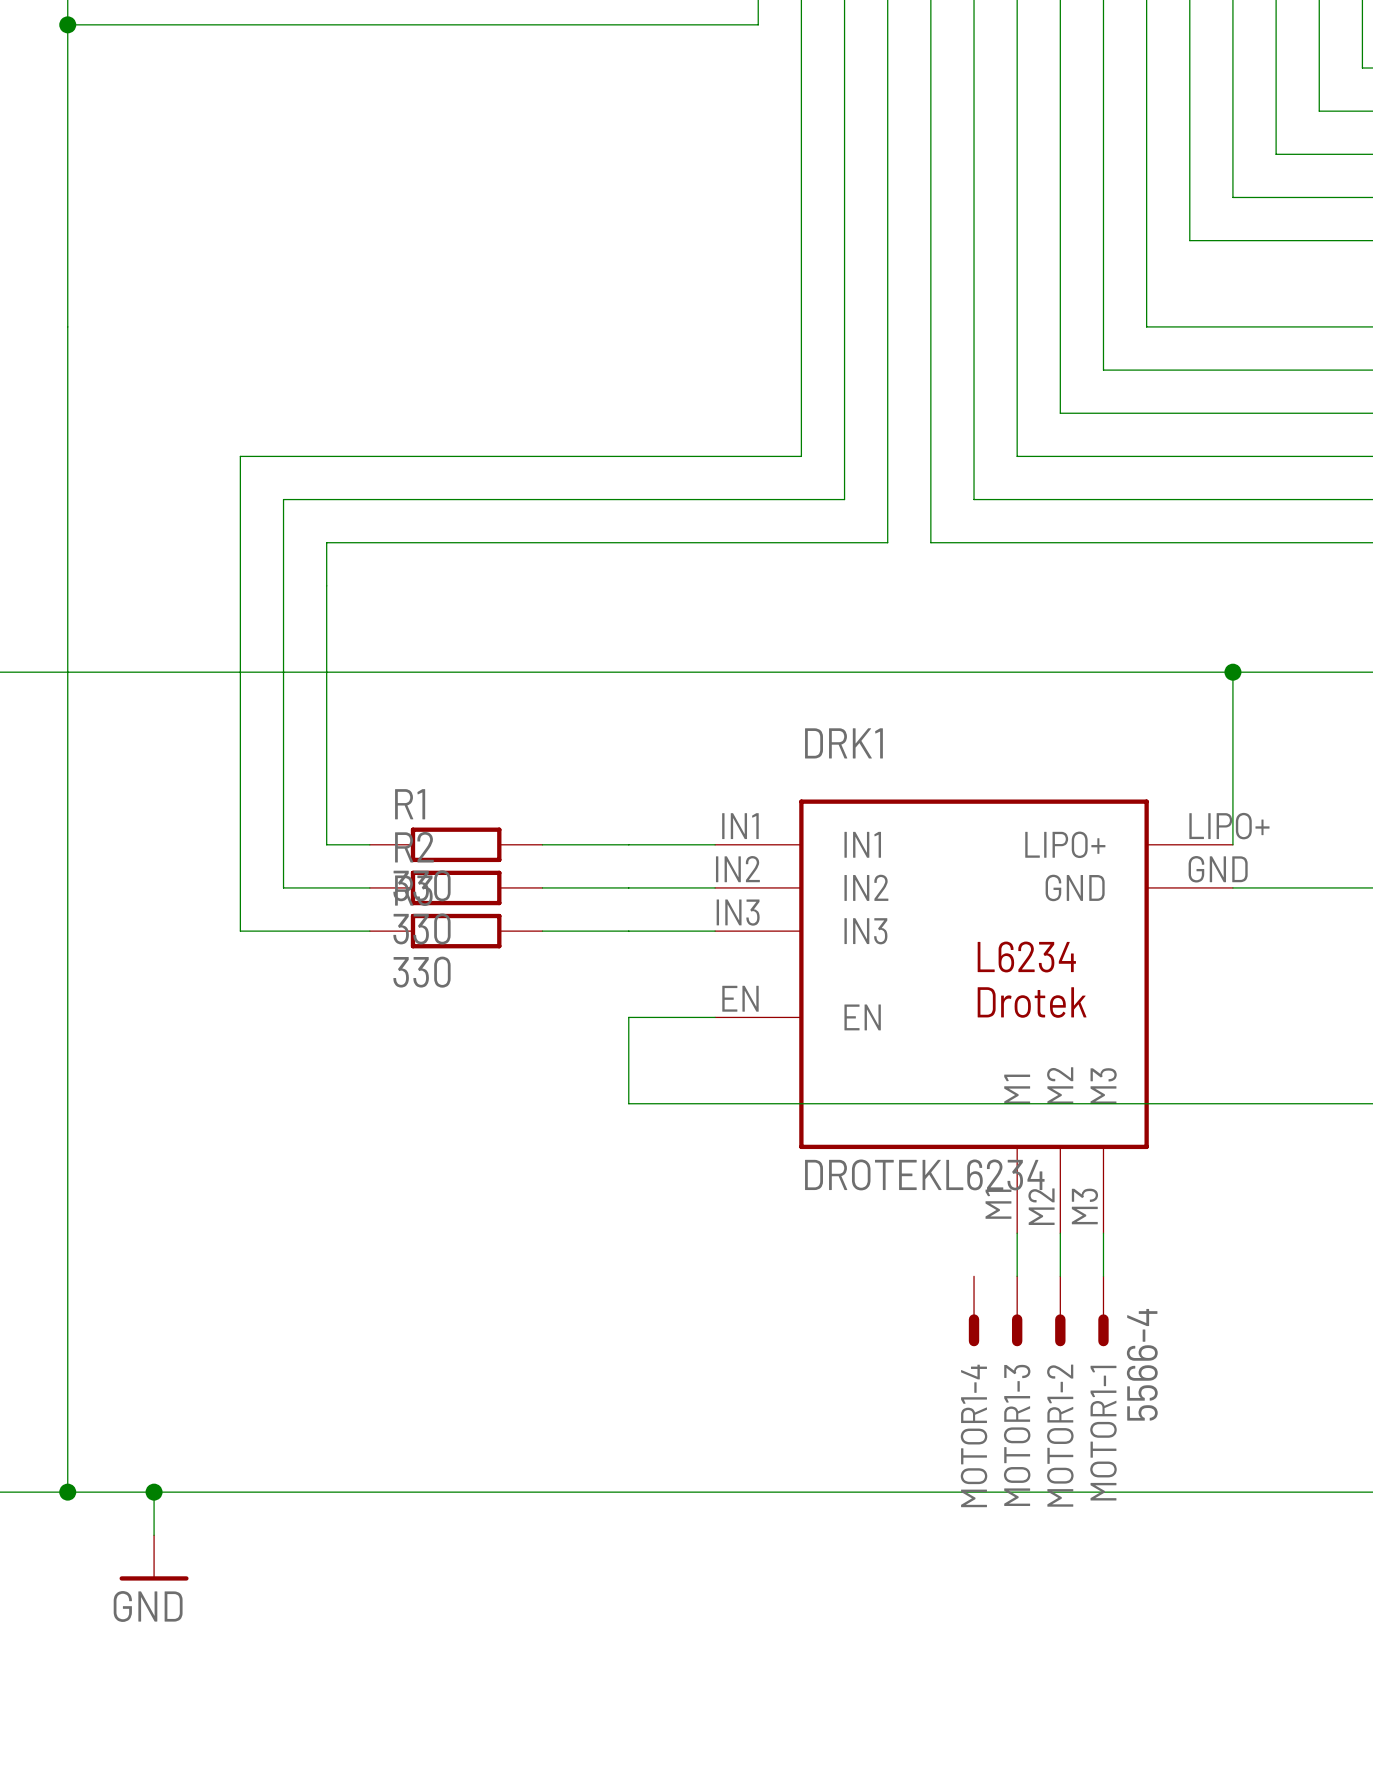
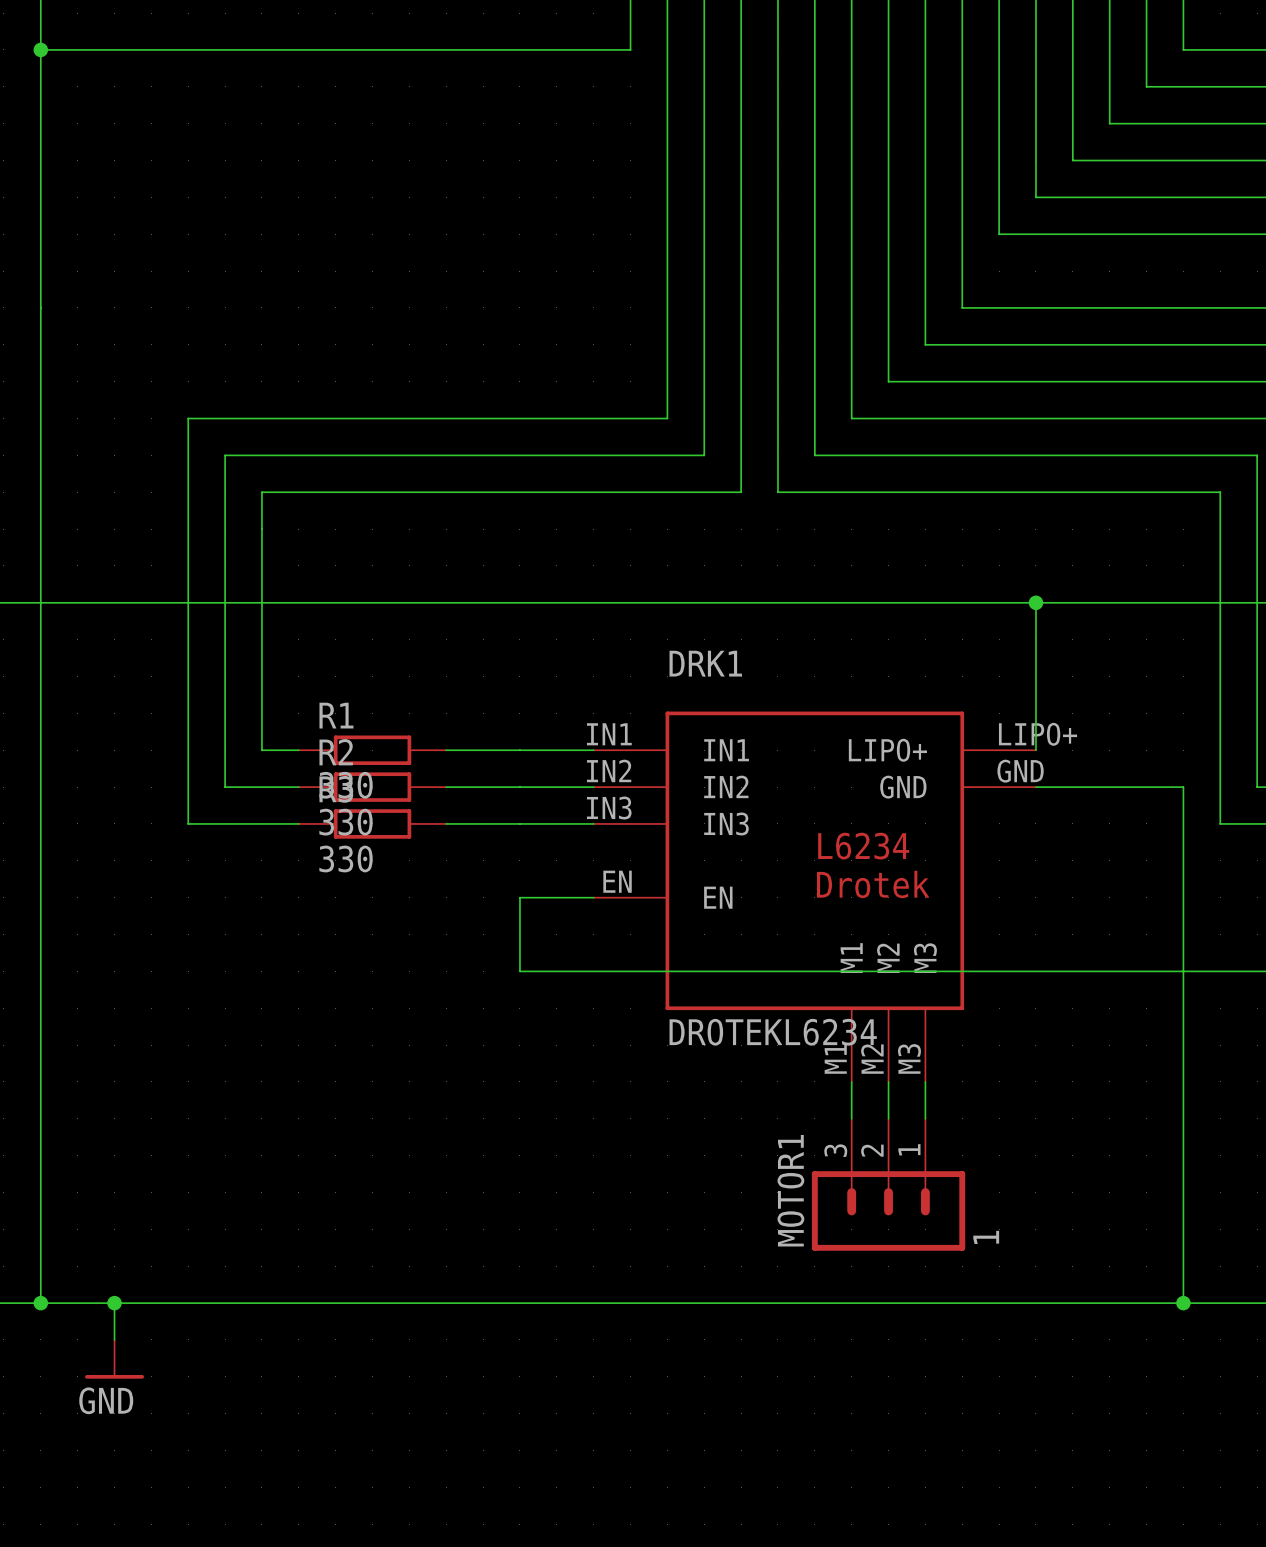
MOTOR1-4: (974, 1311) -> none
MOTOR1-3: (1017, 1311) -> none
MOTOR1-2: (1060, 1311) -> none
MOTOR1-1: 5566-4 (1103, 1311) -> none
MOTOR1: none -> 1 (888, 1184)

